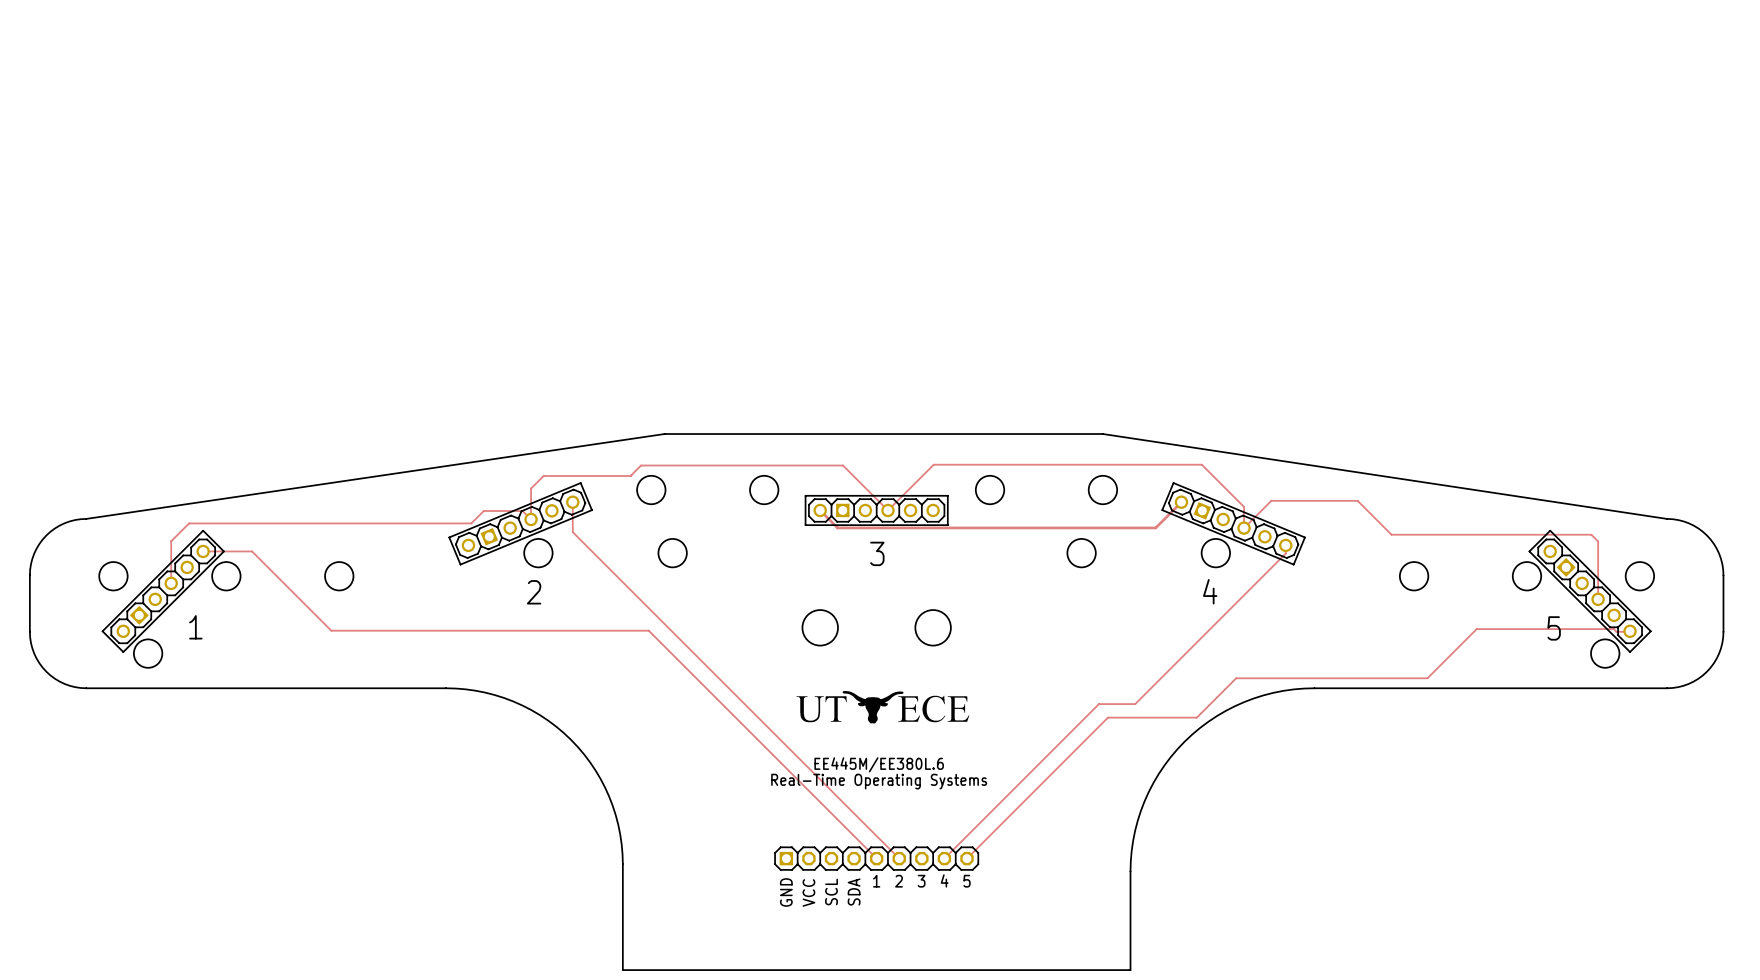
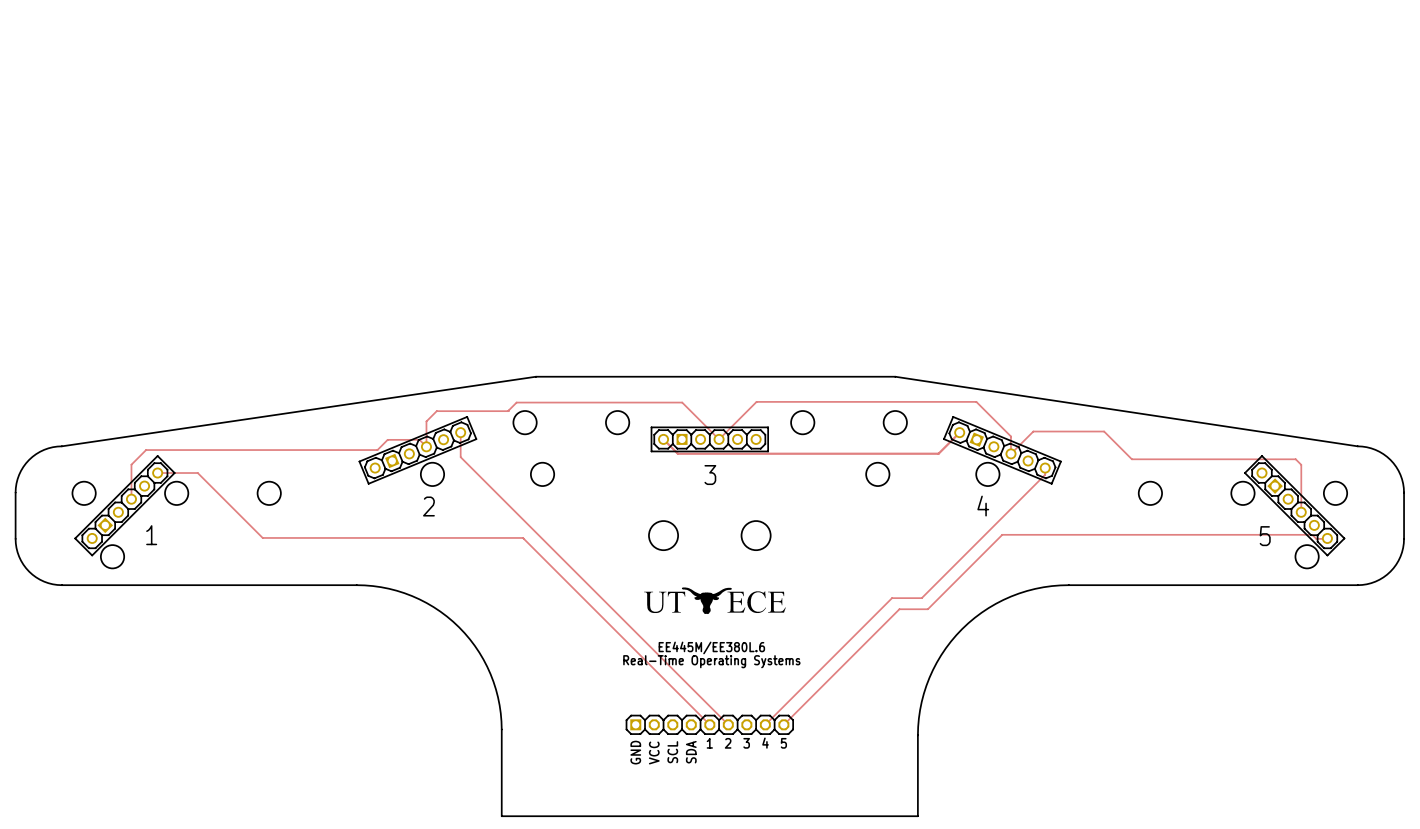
track: (1613, 629) (1476, 629) (1427, 678) (1236, 678) (1196, 717) (1142, 717) -> (1314, 536) (1312, 534) (1002, 534) (927, 609)

